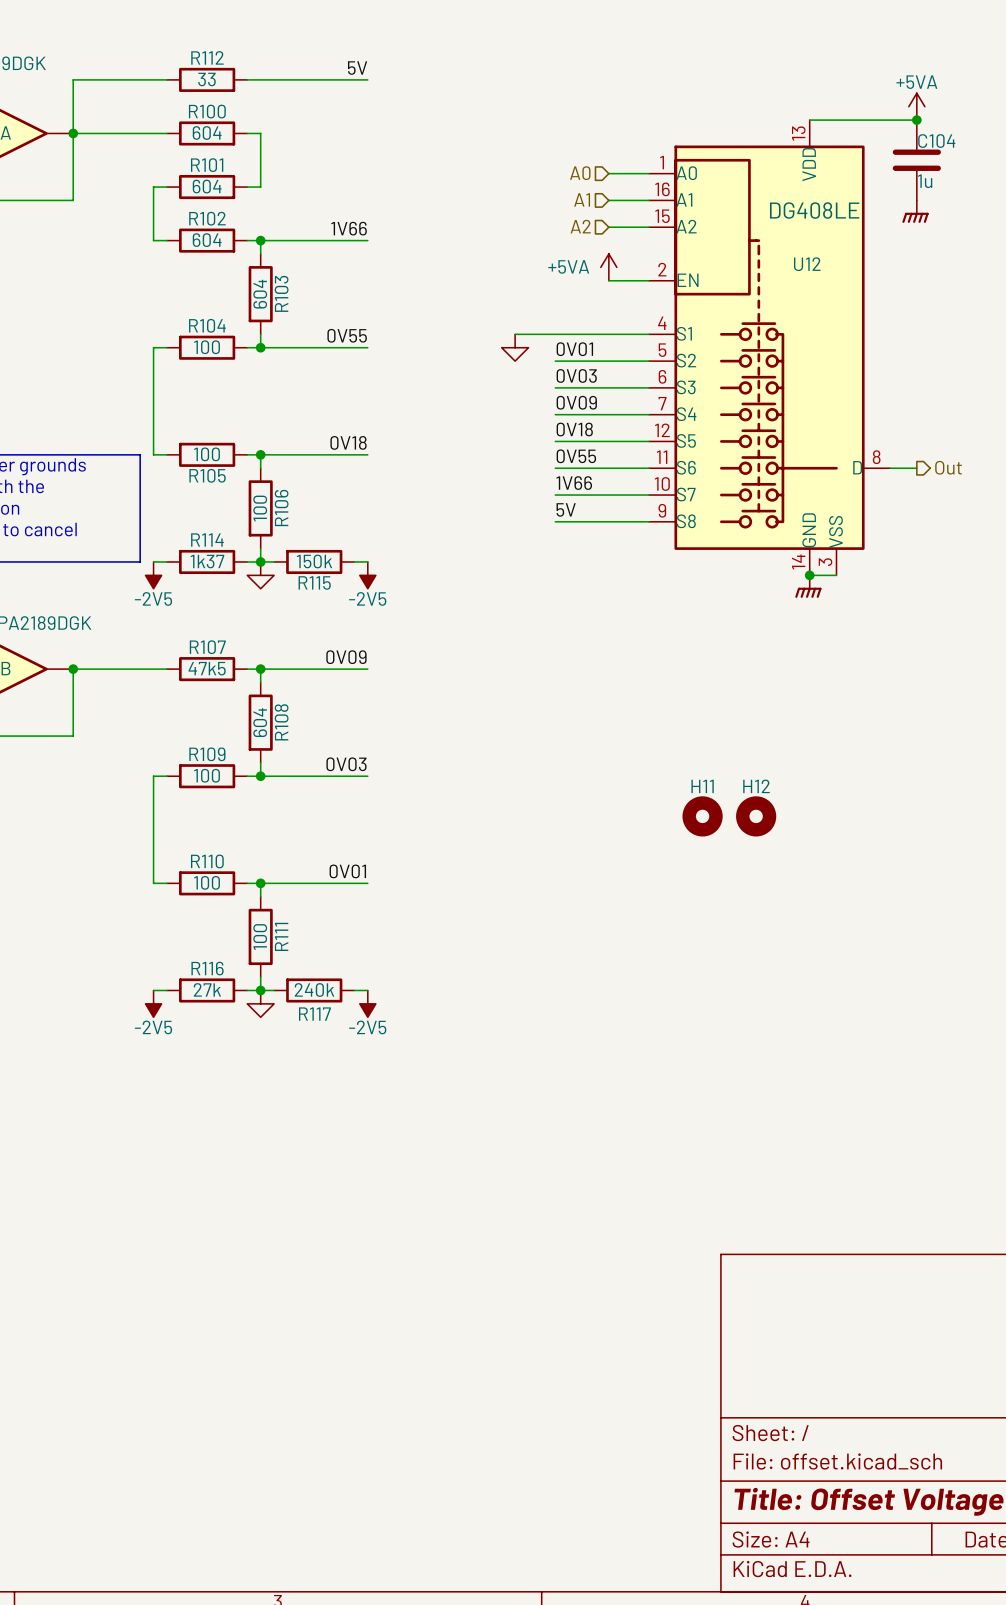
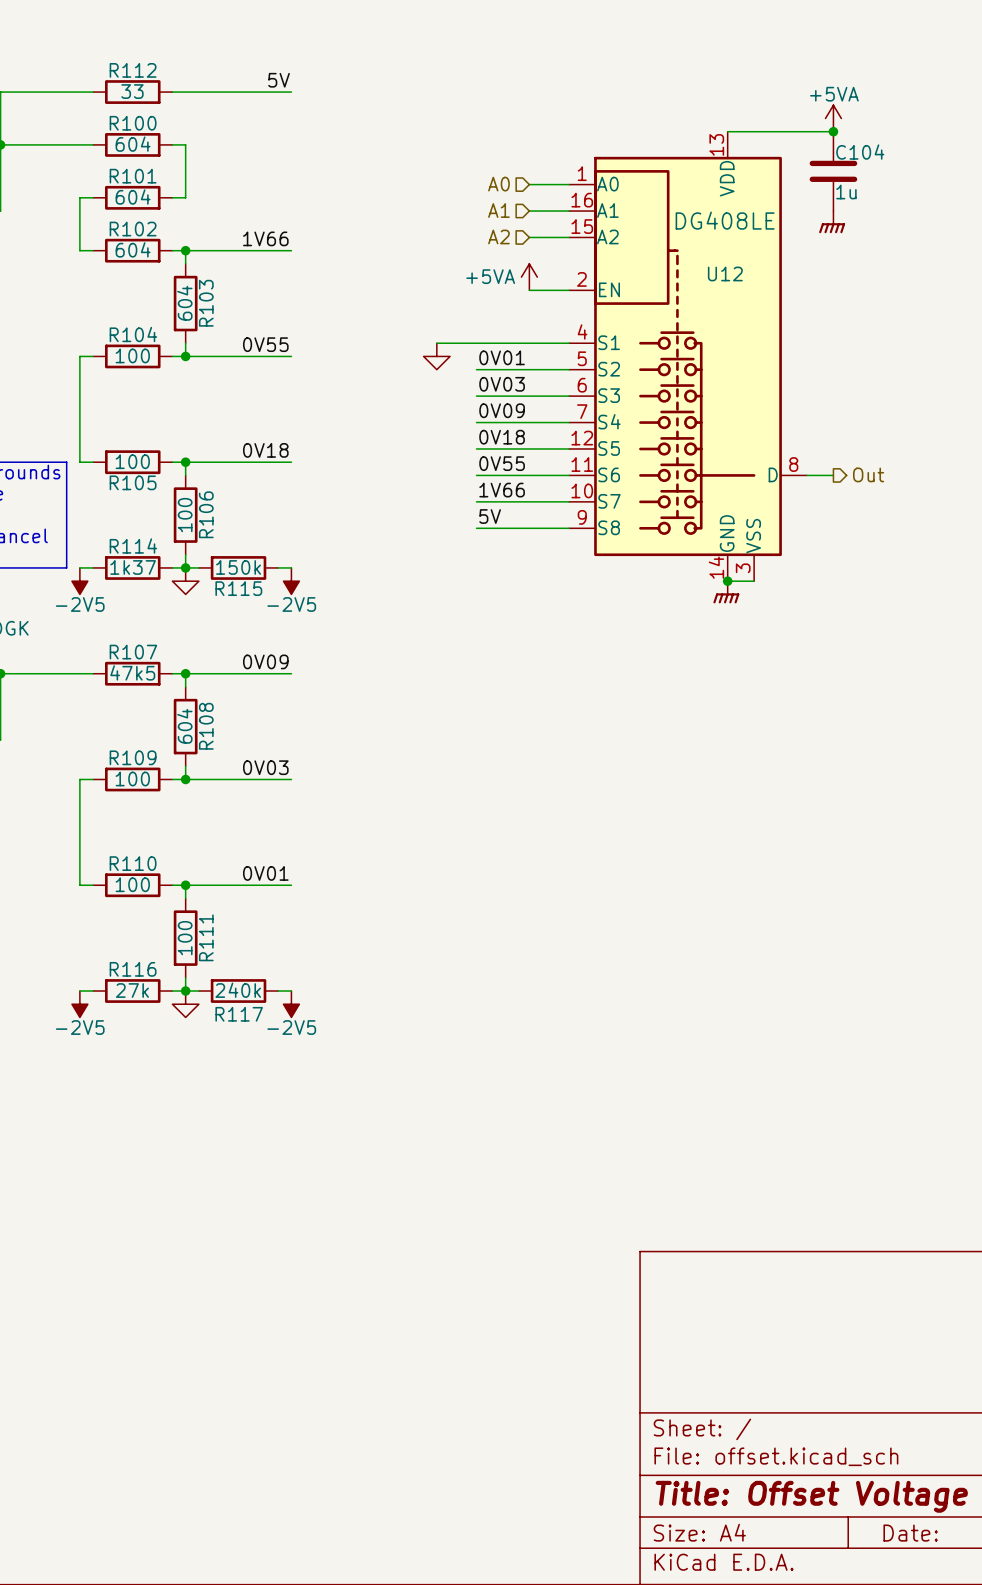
H11: (702, 816) -> none
H12: (756, 816) -> none

